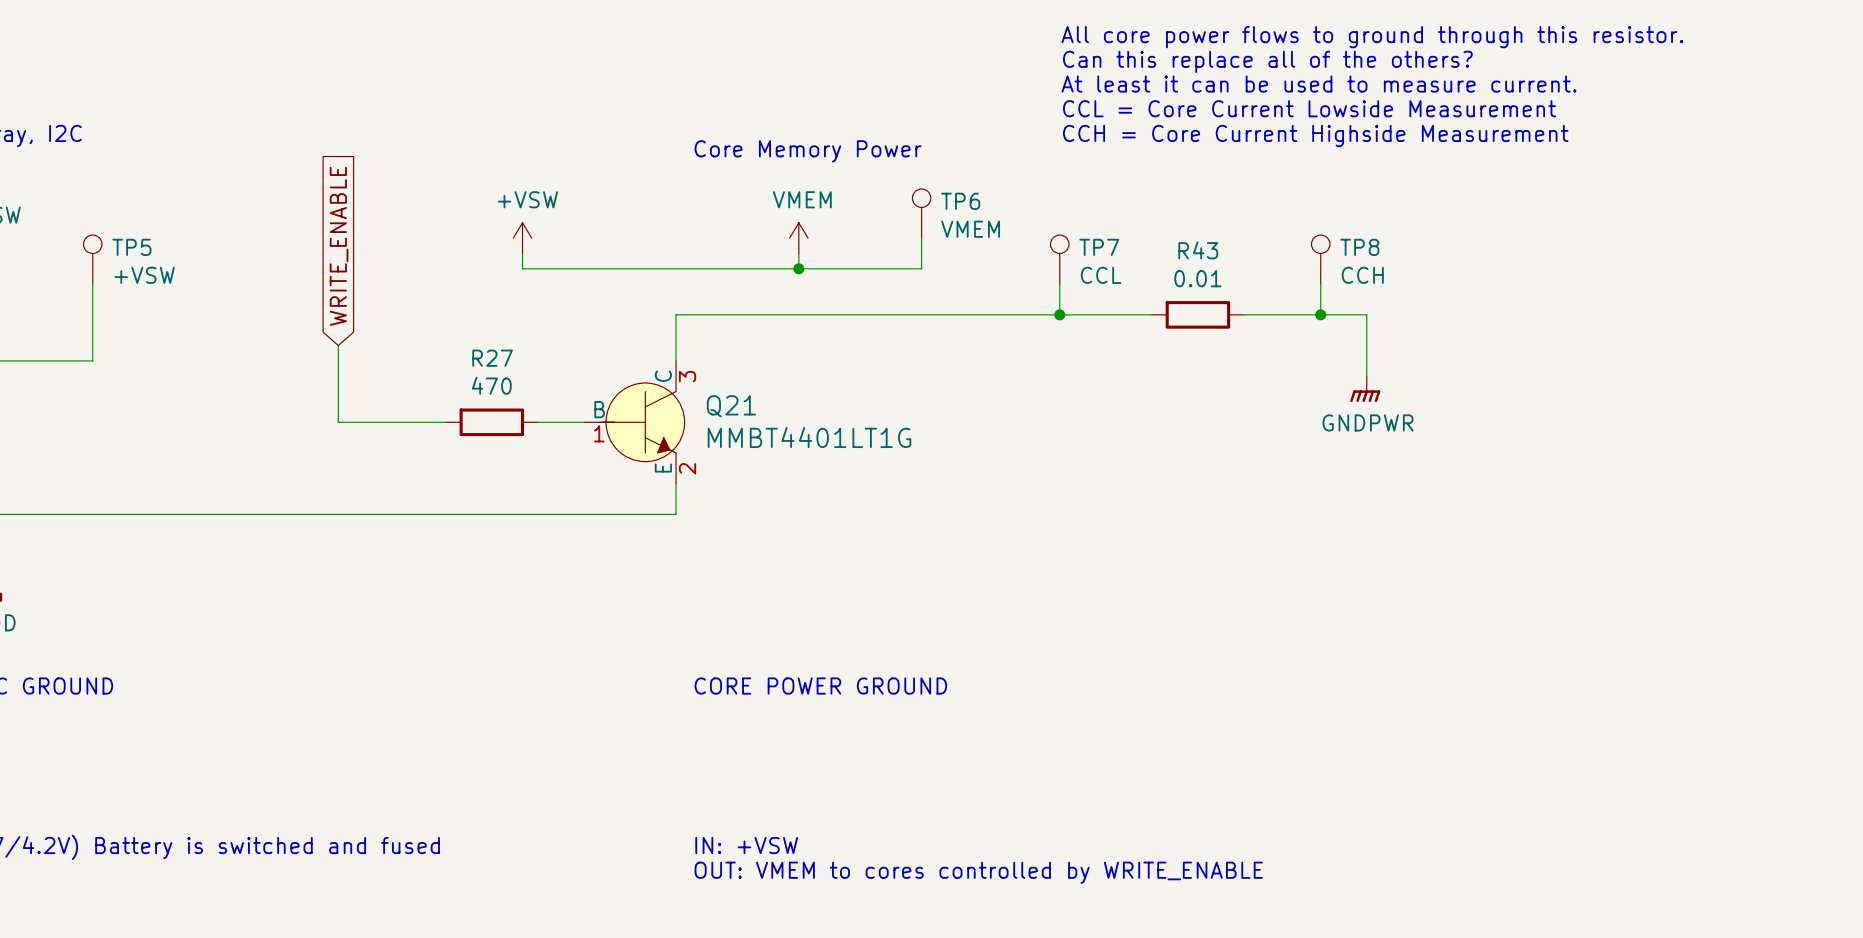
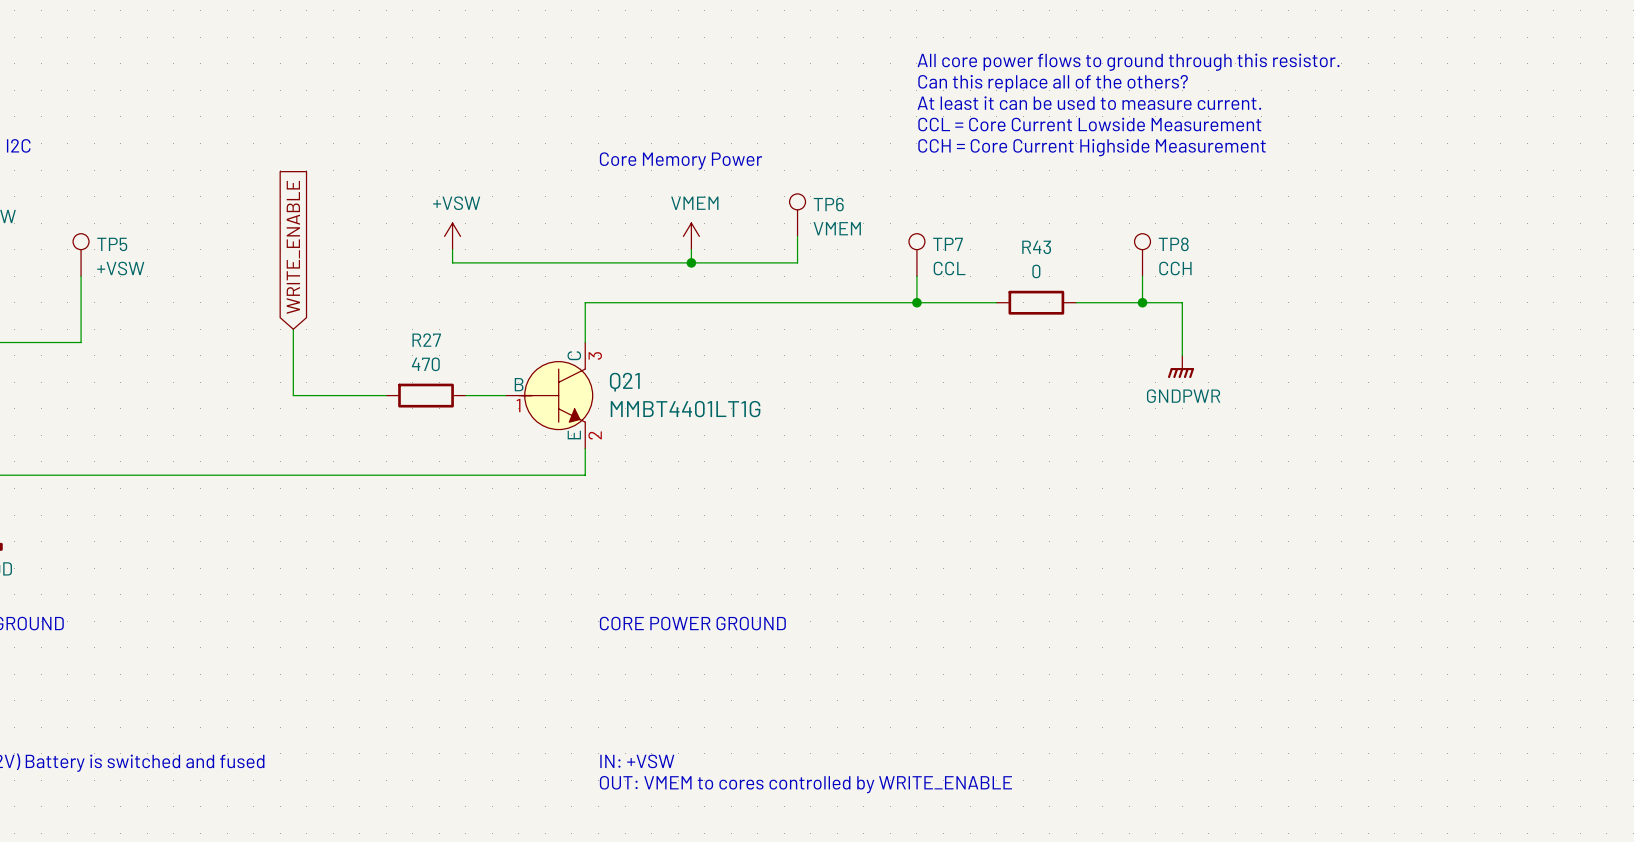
R43 value: 0.01 (1197, 278) -> 0 (1036, 271)

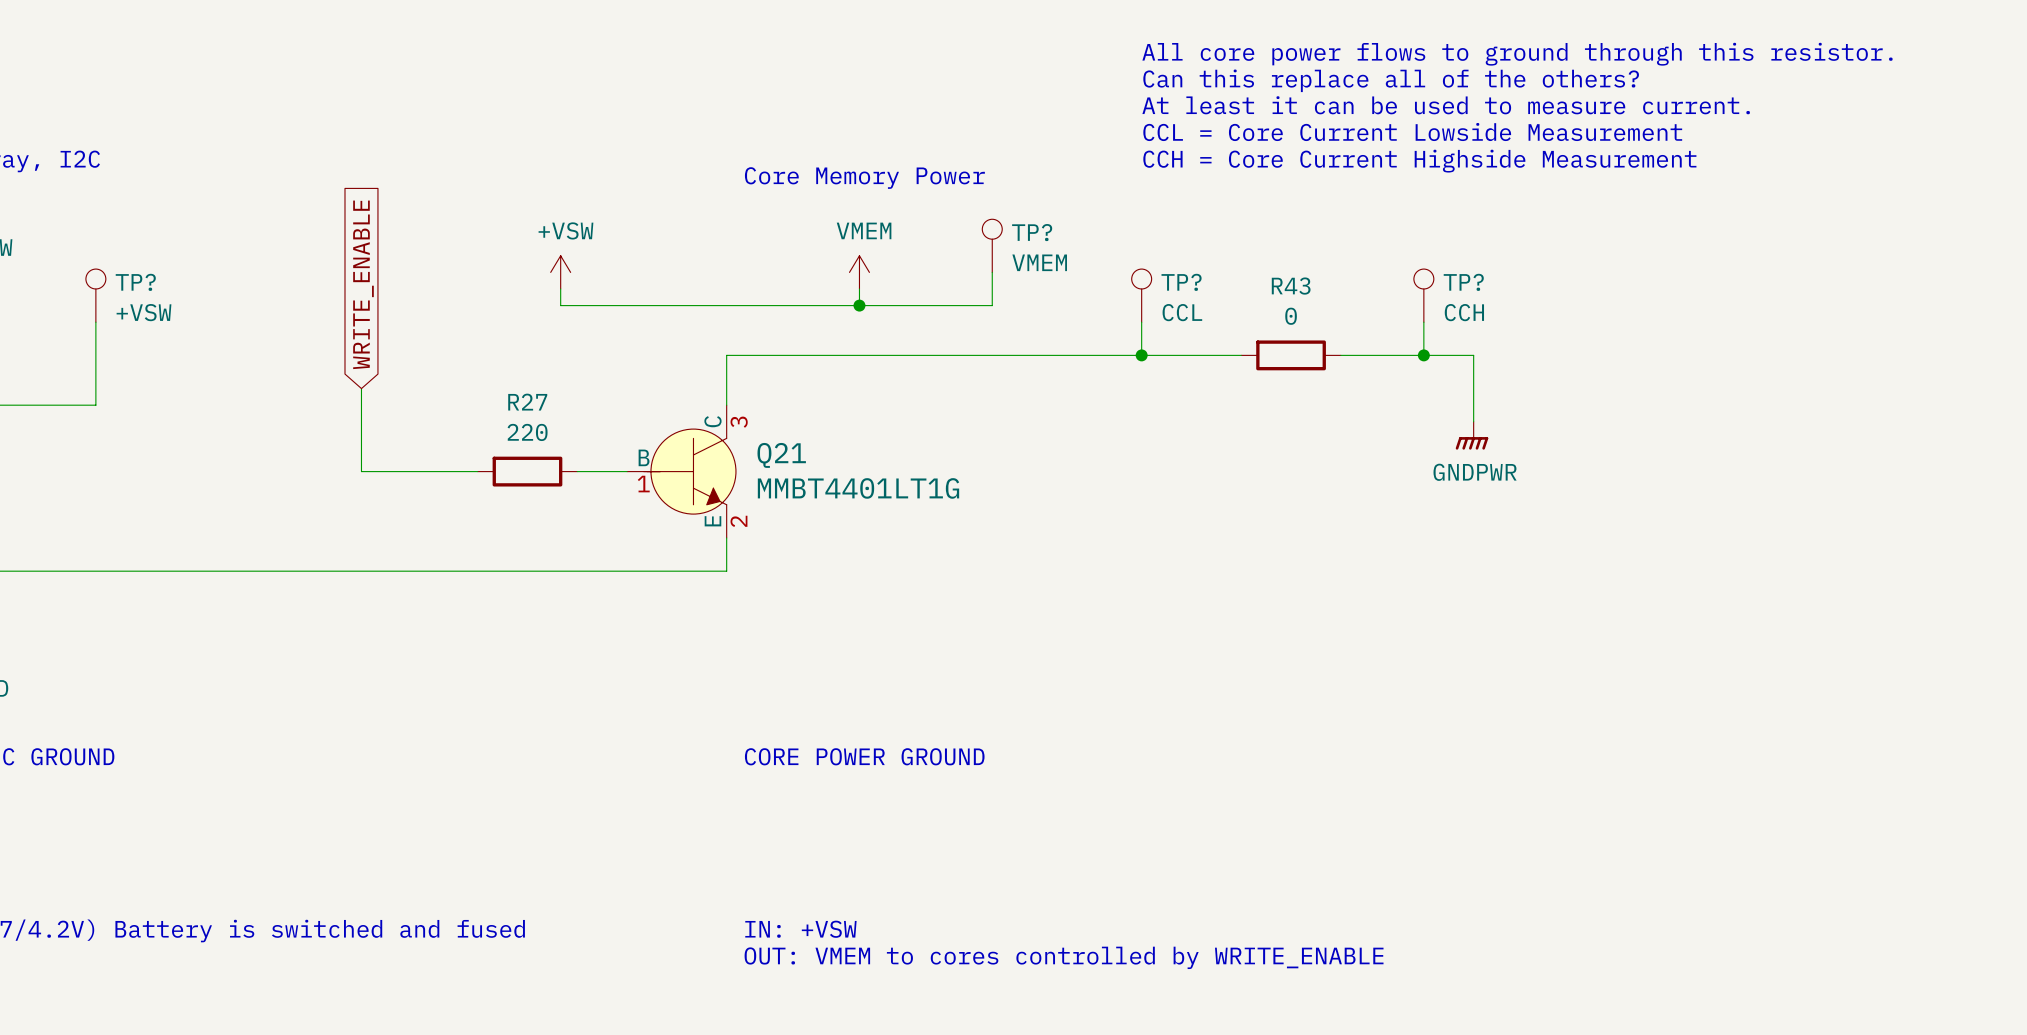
TP6 name: TP6 (828, 204) -> TP? (1032, 232)
TP5 name: TP5 (112, 244) -> TP? (135, 282)
TP7 name: TP7 (948, 244) -> TP? (1181, 282)
TP8 name: TP8 (1173, 244) -> TP? (1463, 282)
R27 value: 470 (425, 364) -> 220 (527, 432)

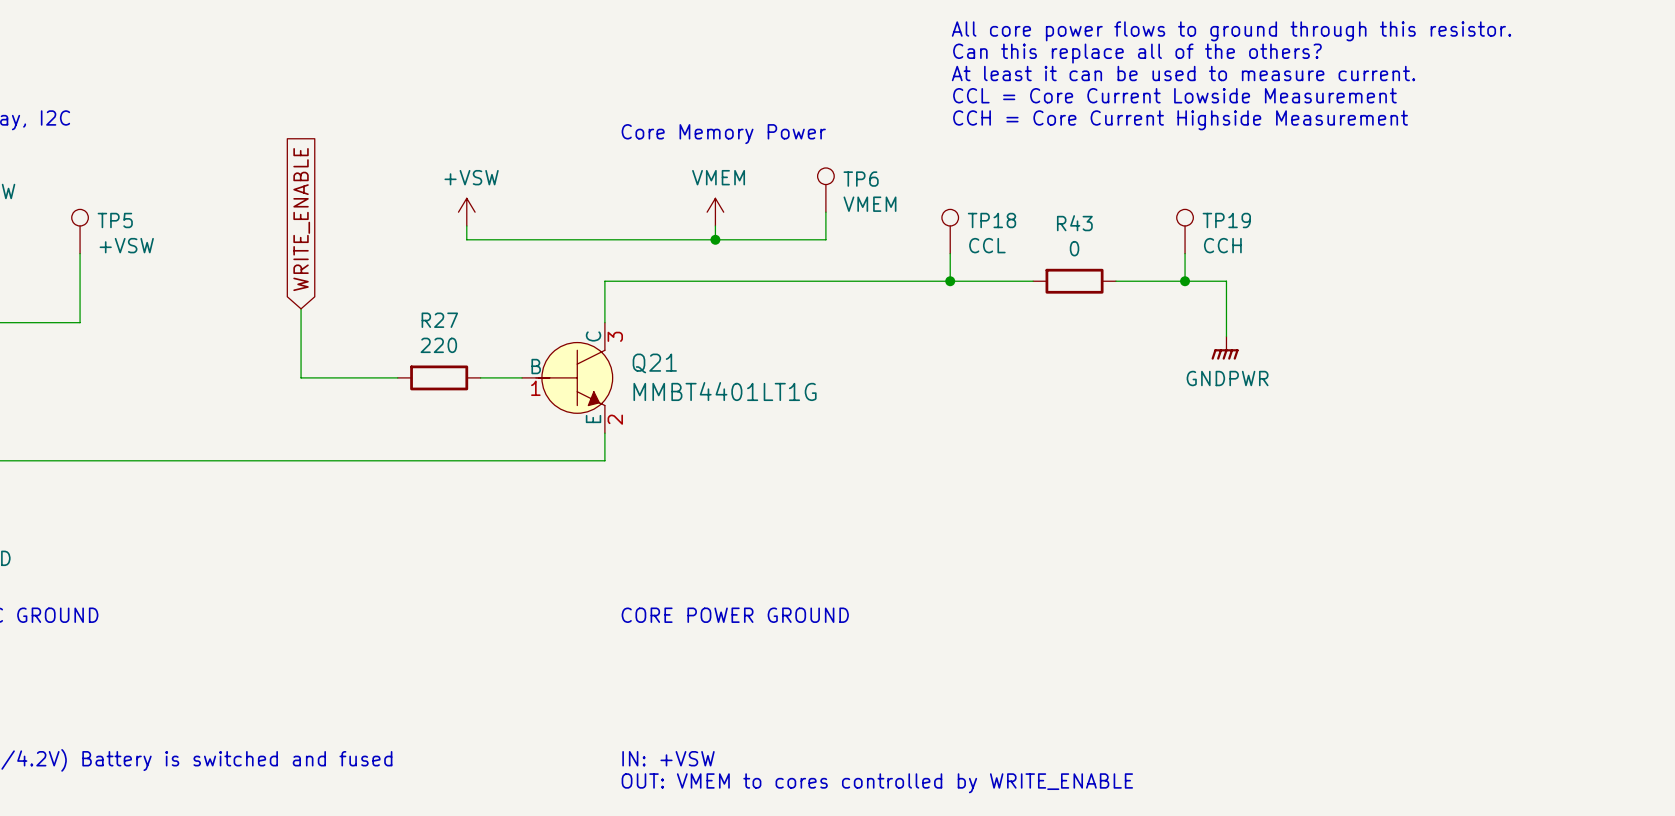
TP? name: TP? (1032, 232) -> TP6 (861, 179)
TP? name: TP? (135, 282) -> TP5 (115, 220)
TP? name: TP? (1181, 282) -> TP18 (992, 220)
TP? name: TP? (1463, 282) -> TP19 (1226, 220)

